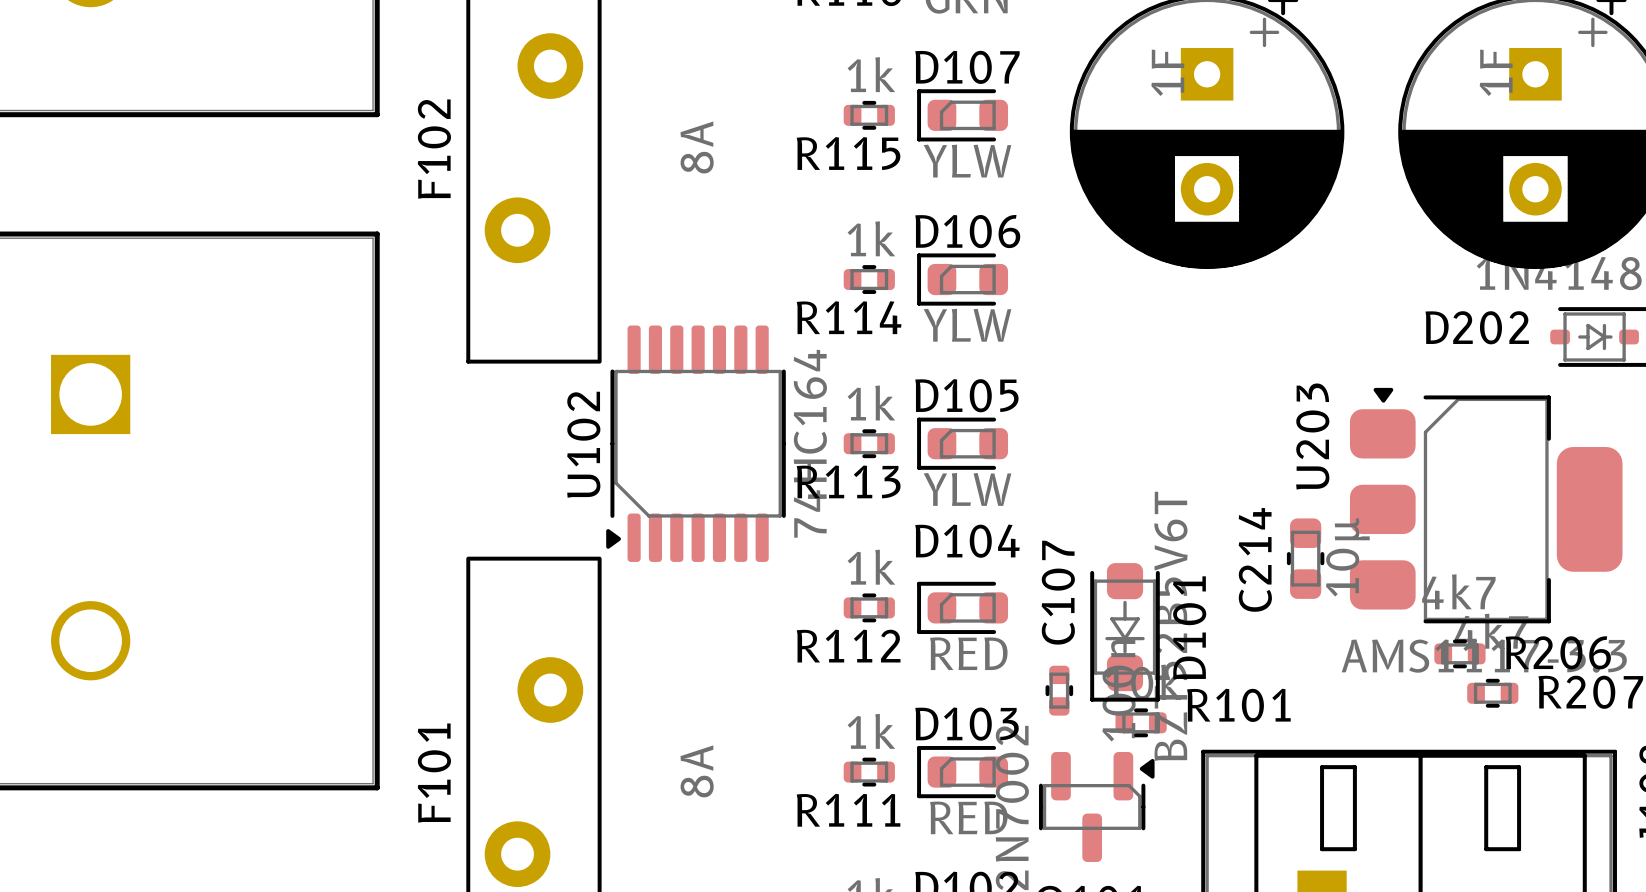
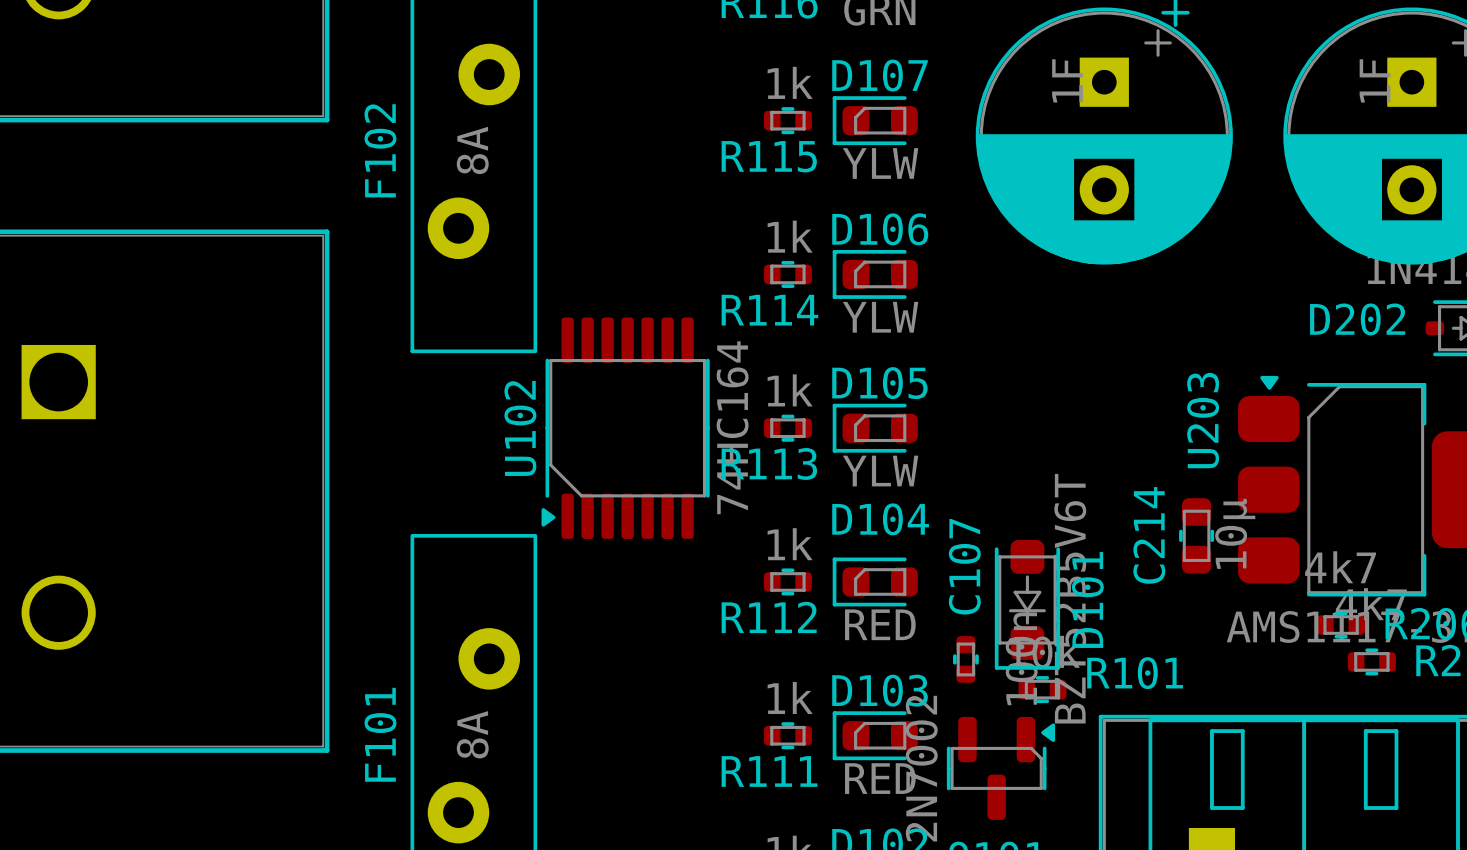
F102 value position: 8A (697, 147) -> 8A (472, 150)
F101 value position: 8A (697, 771) -> 8A (472, 734)

